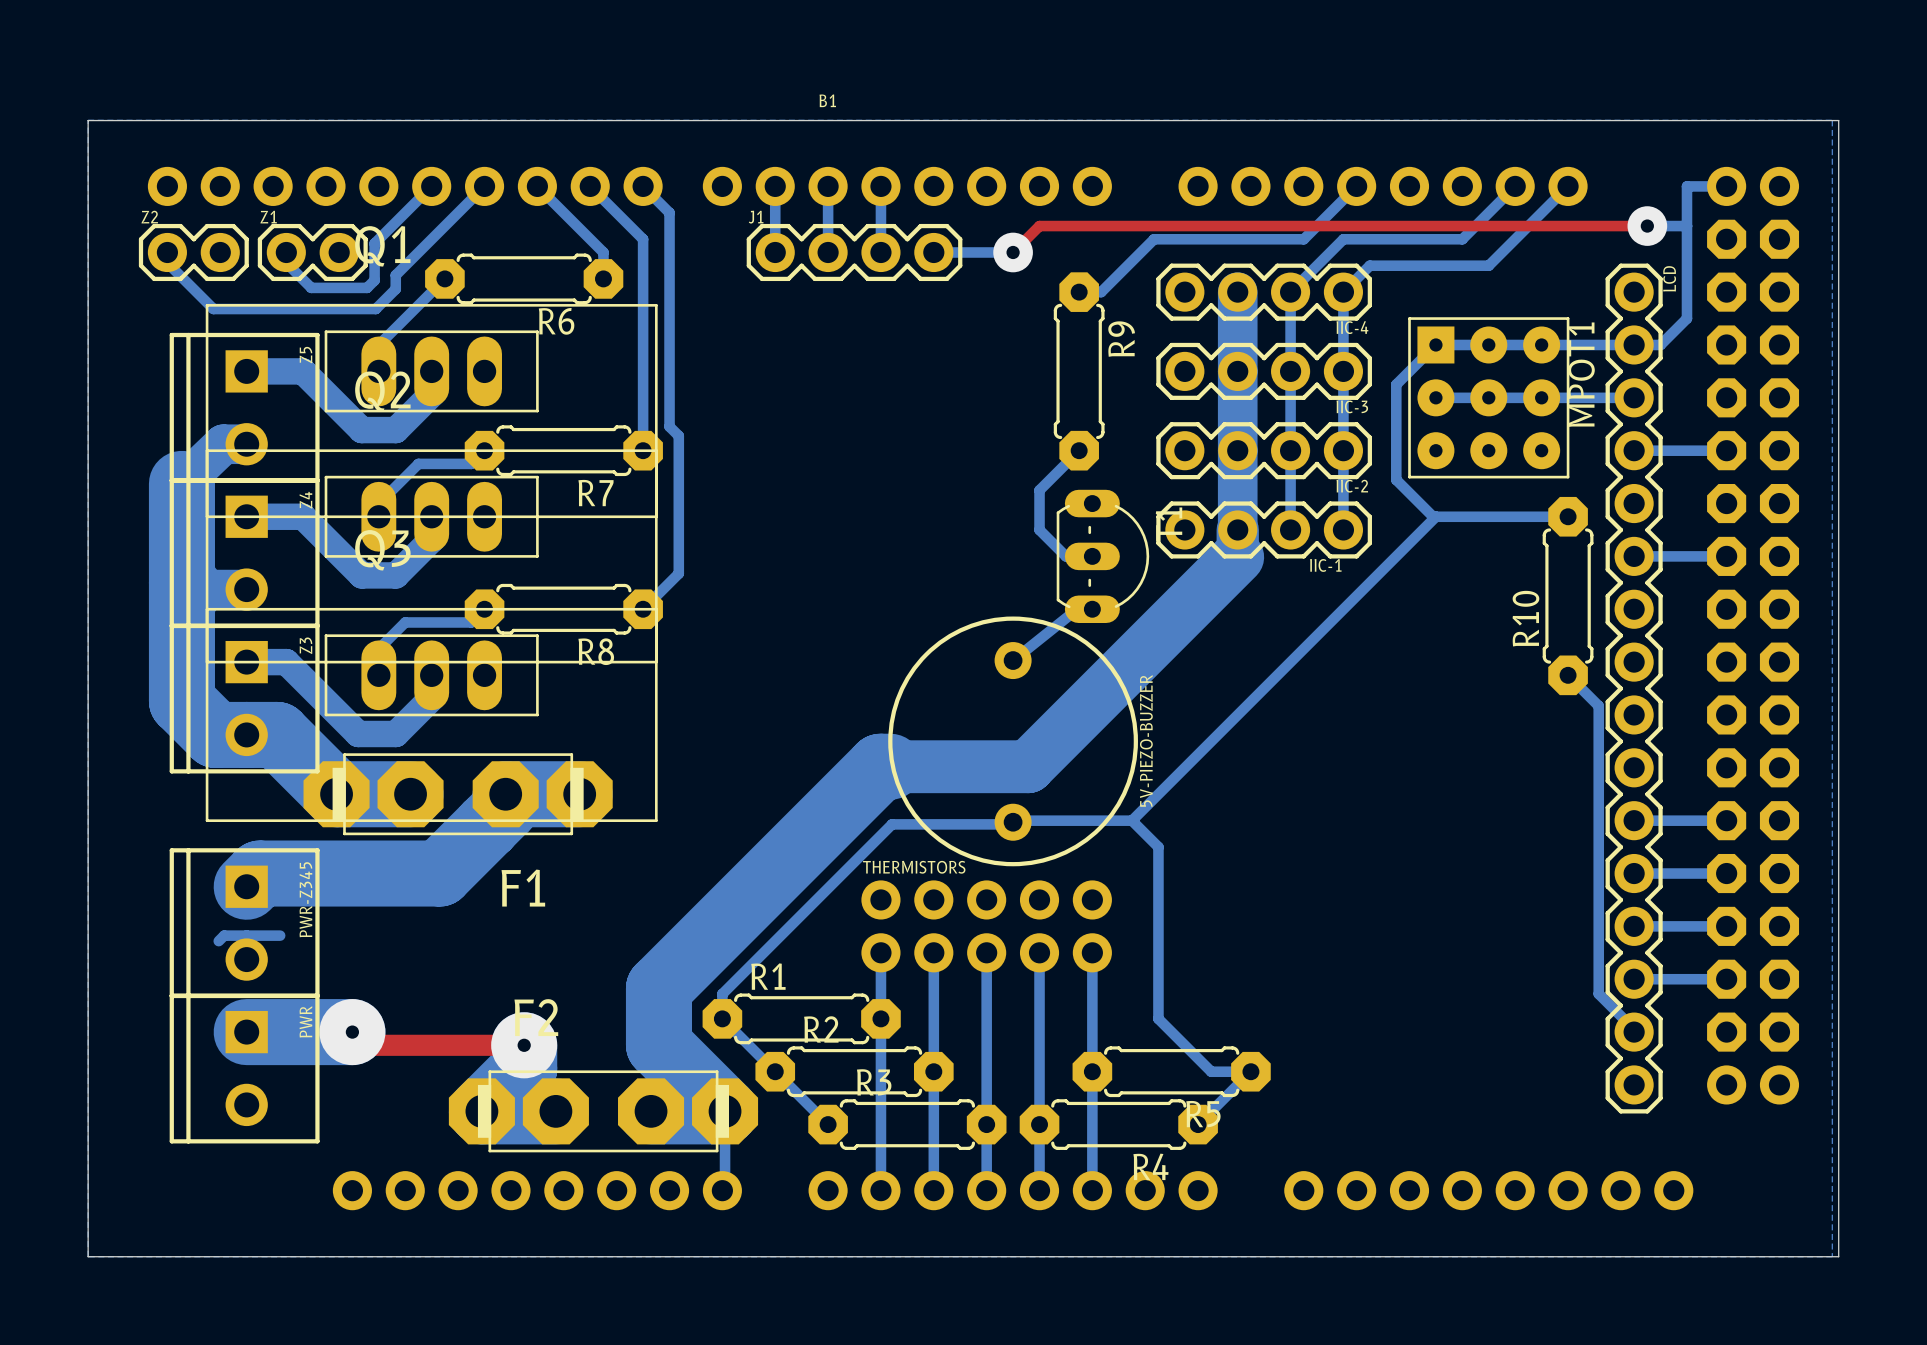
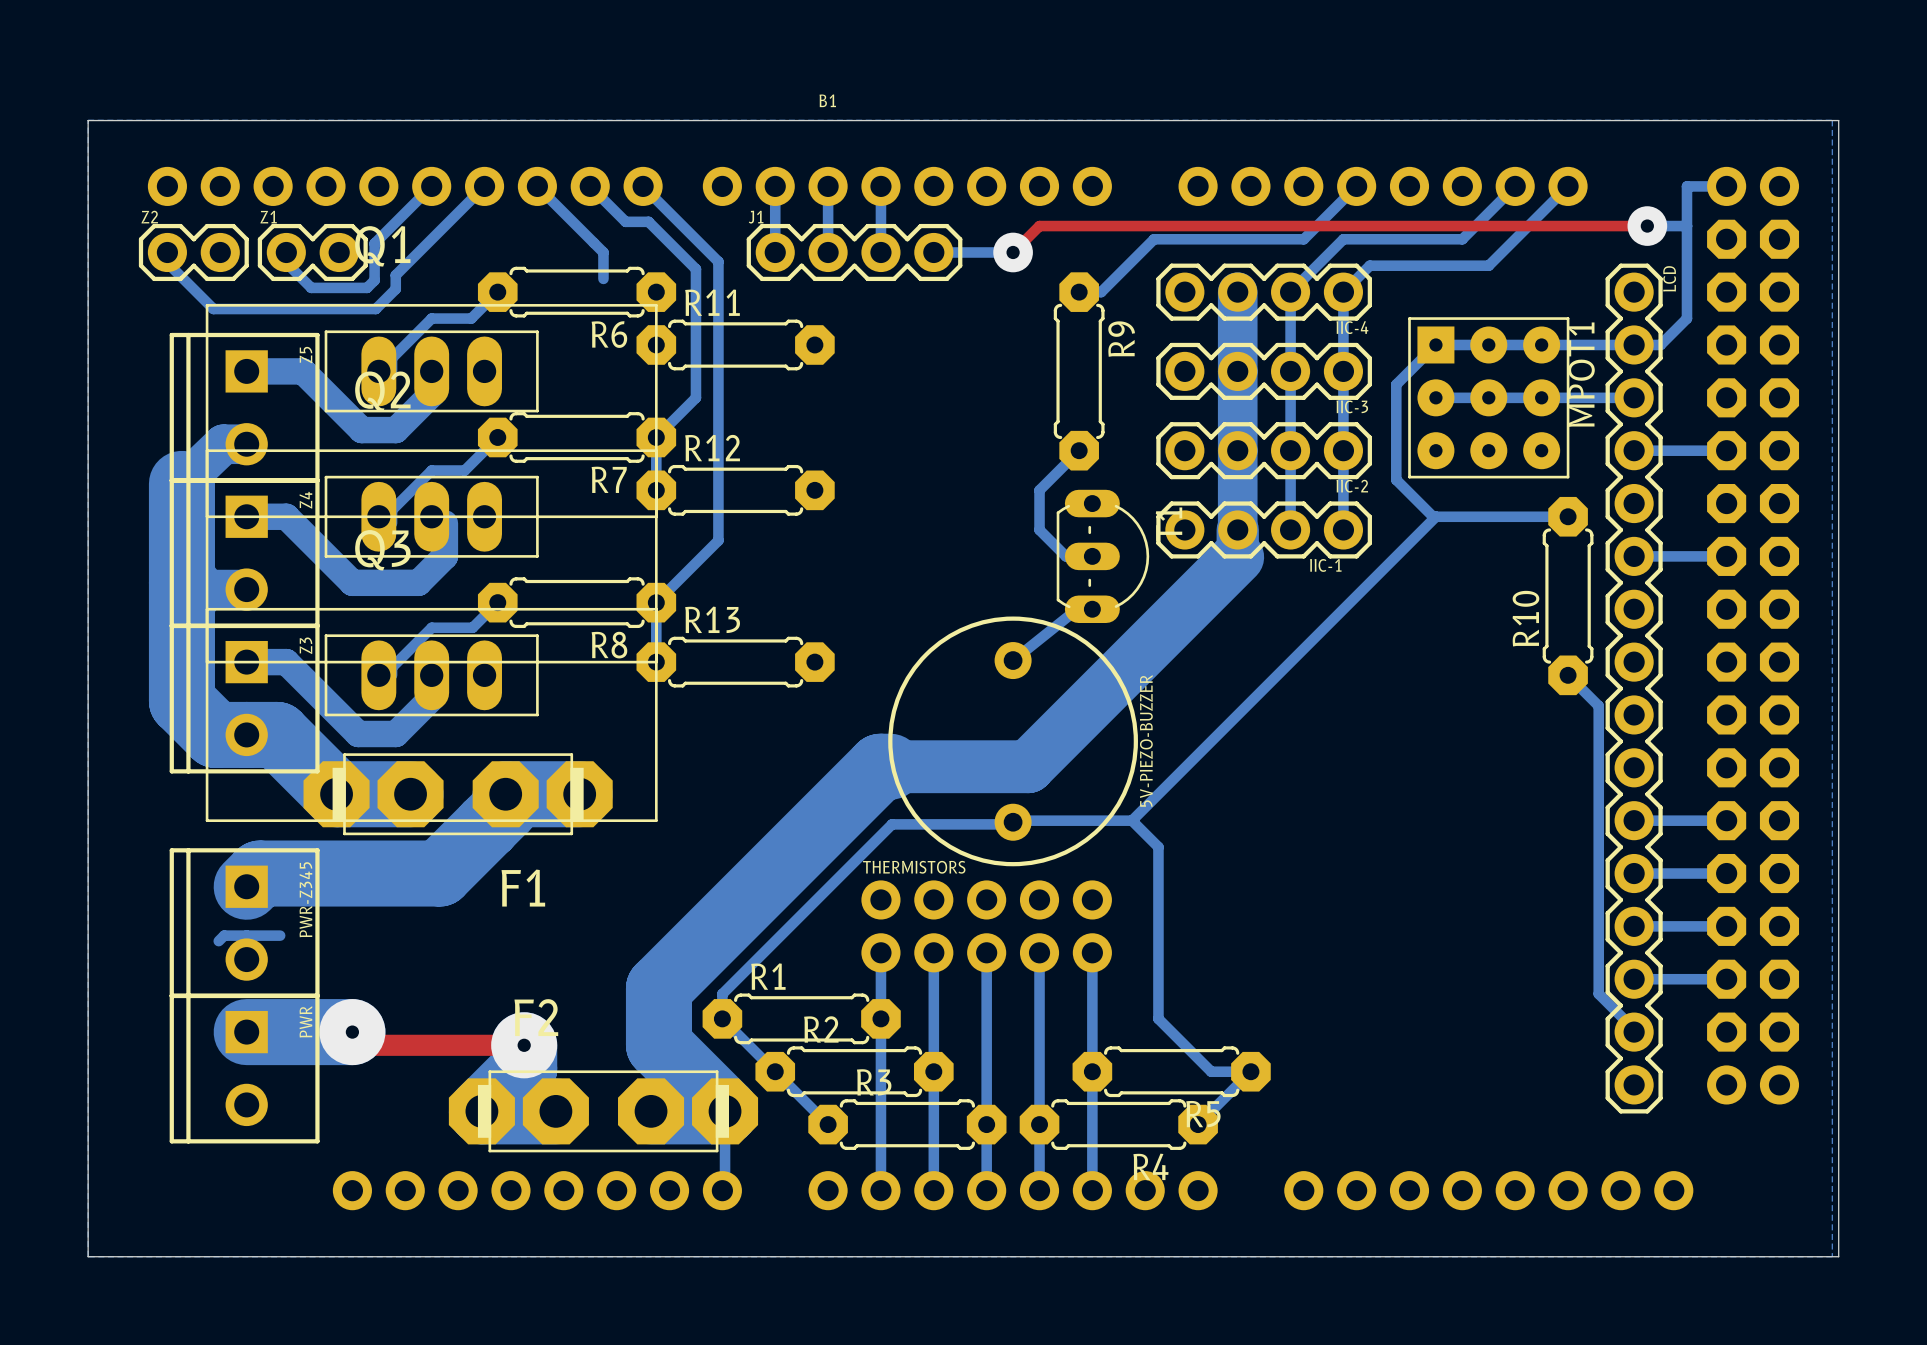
bottom track: (669, 212) (669, 426) (678, 435) (678, 573) (643, 609) -> (669, 212) (718, 261) (718, 540) (656, 602) (656, 662)
bottom track: (625, 221) (643, 239) (643, 450) -> (625, 221) (648, 221) (695, 269) (695, 397) (656, 437) (656, 490)
bottom track: (444, 278) (378, 344) (378, 371) -> none
R6 position: (524, 278) -> (577, 292)
bottom track: none -> (497, 292) (471, 318) (431, 318) (392, 358) (392, 371)
R11: none -> (735, 344)
R7 position: (563, 450) -> (577, 437)
bottom track: (471, 463) (418, 463) (378, 503) (378, 516) -> (471, 463) (464, 470) (431, 470) (392, 510) (392, 523)
R12: none -> (735, 490)
bottom track: (286, 516) (303, 516) (361, 575) (395, 575) (431, 539) (431, 516) -> (286, 516) (352, 582) (418, 582) (444, 556) (444, 523)
bottom track: none -> (497, 602) (472, 627) (431, 627) (392, 667) (392, 675)
bottom track: (484, 609) (471, 622) (405, 622) (378, 648) (378, 675) -> none
R8 position: (563, 609) -> (577, 602)
R13: none -> (735, 662)

